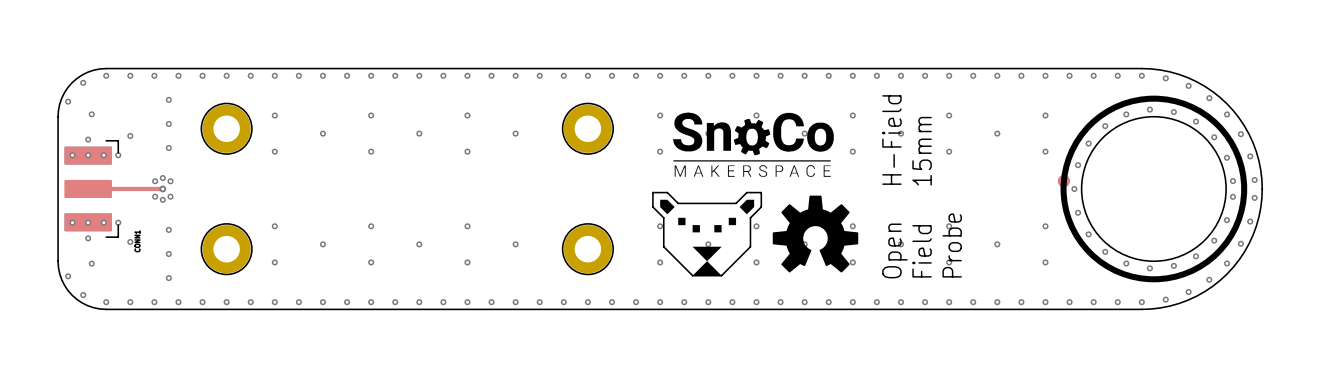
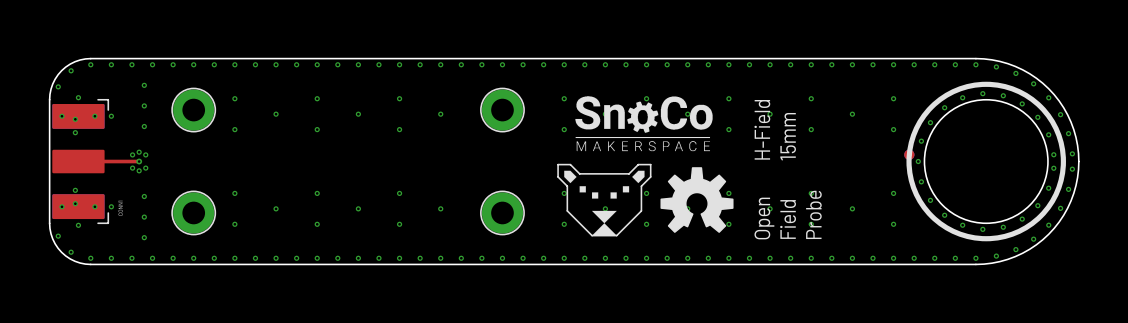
via: none -> (61, 116)
via: none -> (94, 116)
part footprint: [64, 140, 120, 238] -> [52, 99, 109, 224]
via: (72, 155) -> none
via: (103, 155) -> none
via: (118, 155) -> none
via: (72, 222) -> none
via: (103, 222) -> none
via: (118, 222) -> none
via: none -> (61, 206)
via: none -> (94, 206)

